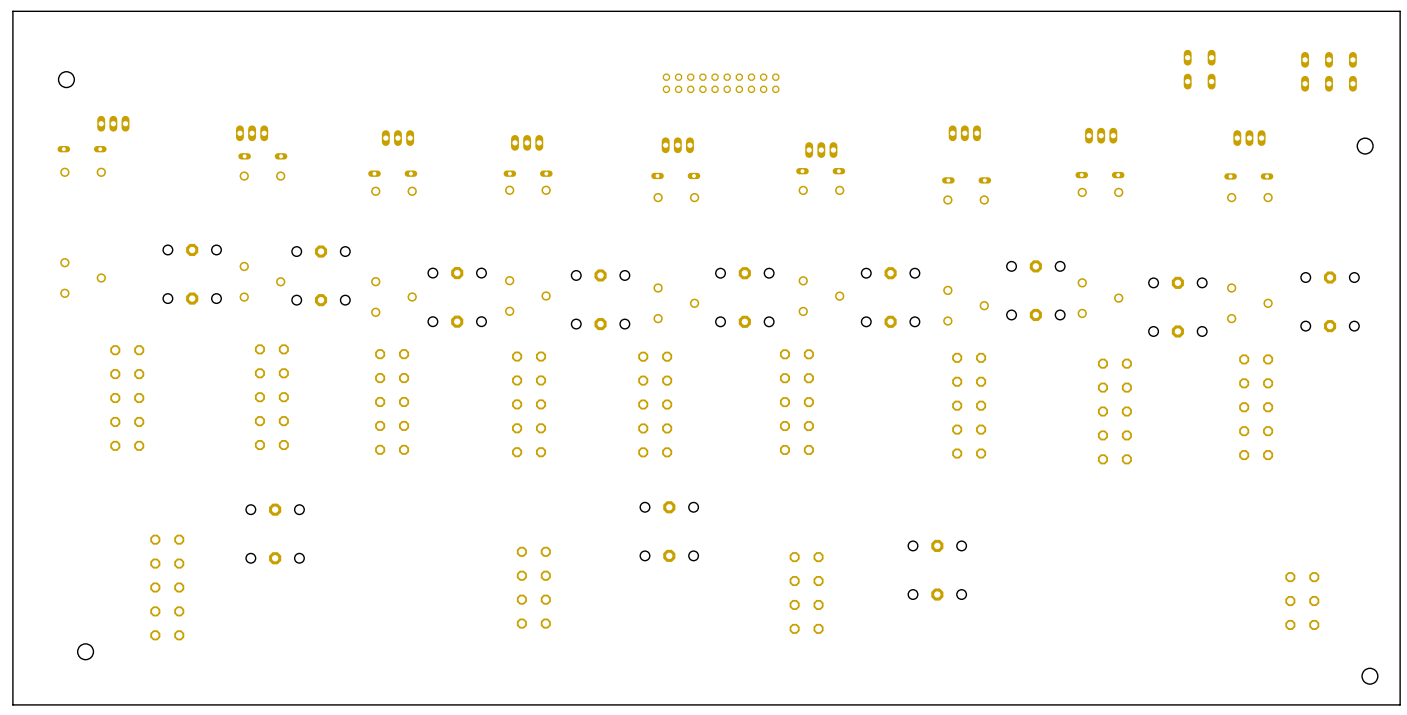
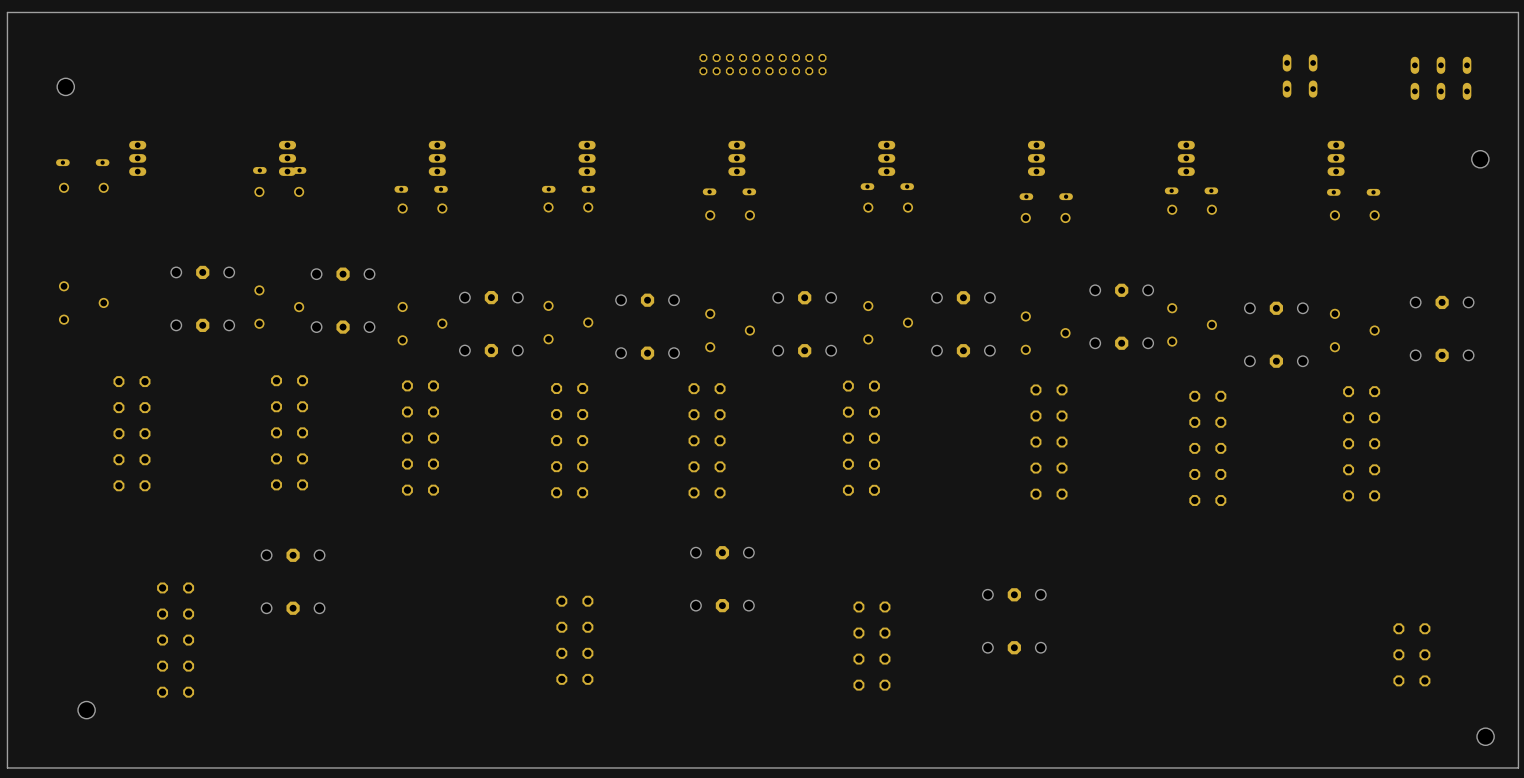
part position: (721, 83) -> (762, 64)
part rotation: 0° (113, 123) -> 90° clockwise (137, 158)
part position: (113, 123) -> (137, 158)
part rotation: 0° (252, 133) -> 90° clockwise (287, 158)
part position: (252, 133) -> (287, 158)
part rotation: 0° (964, 133) -> 90° clockwise (1036, 158)
part rotation: 0° (1101, 135) -> 90° clockwise (1186, 158)
part rotation: 0° (397, 138) -> 90° clockwise (437, 158)
part rotation: 0° (1249, 138) -> 90° clockwise (1336, 158)
part rotation: 0° (527, 142) -> 90° clockwise (587, 158)
part rotation: 0° (677, 145) -> 90° clockwise (736, 158)
part rotation: 0° (821, 150) -> 90° clockwise (886, 158)

